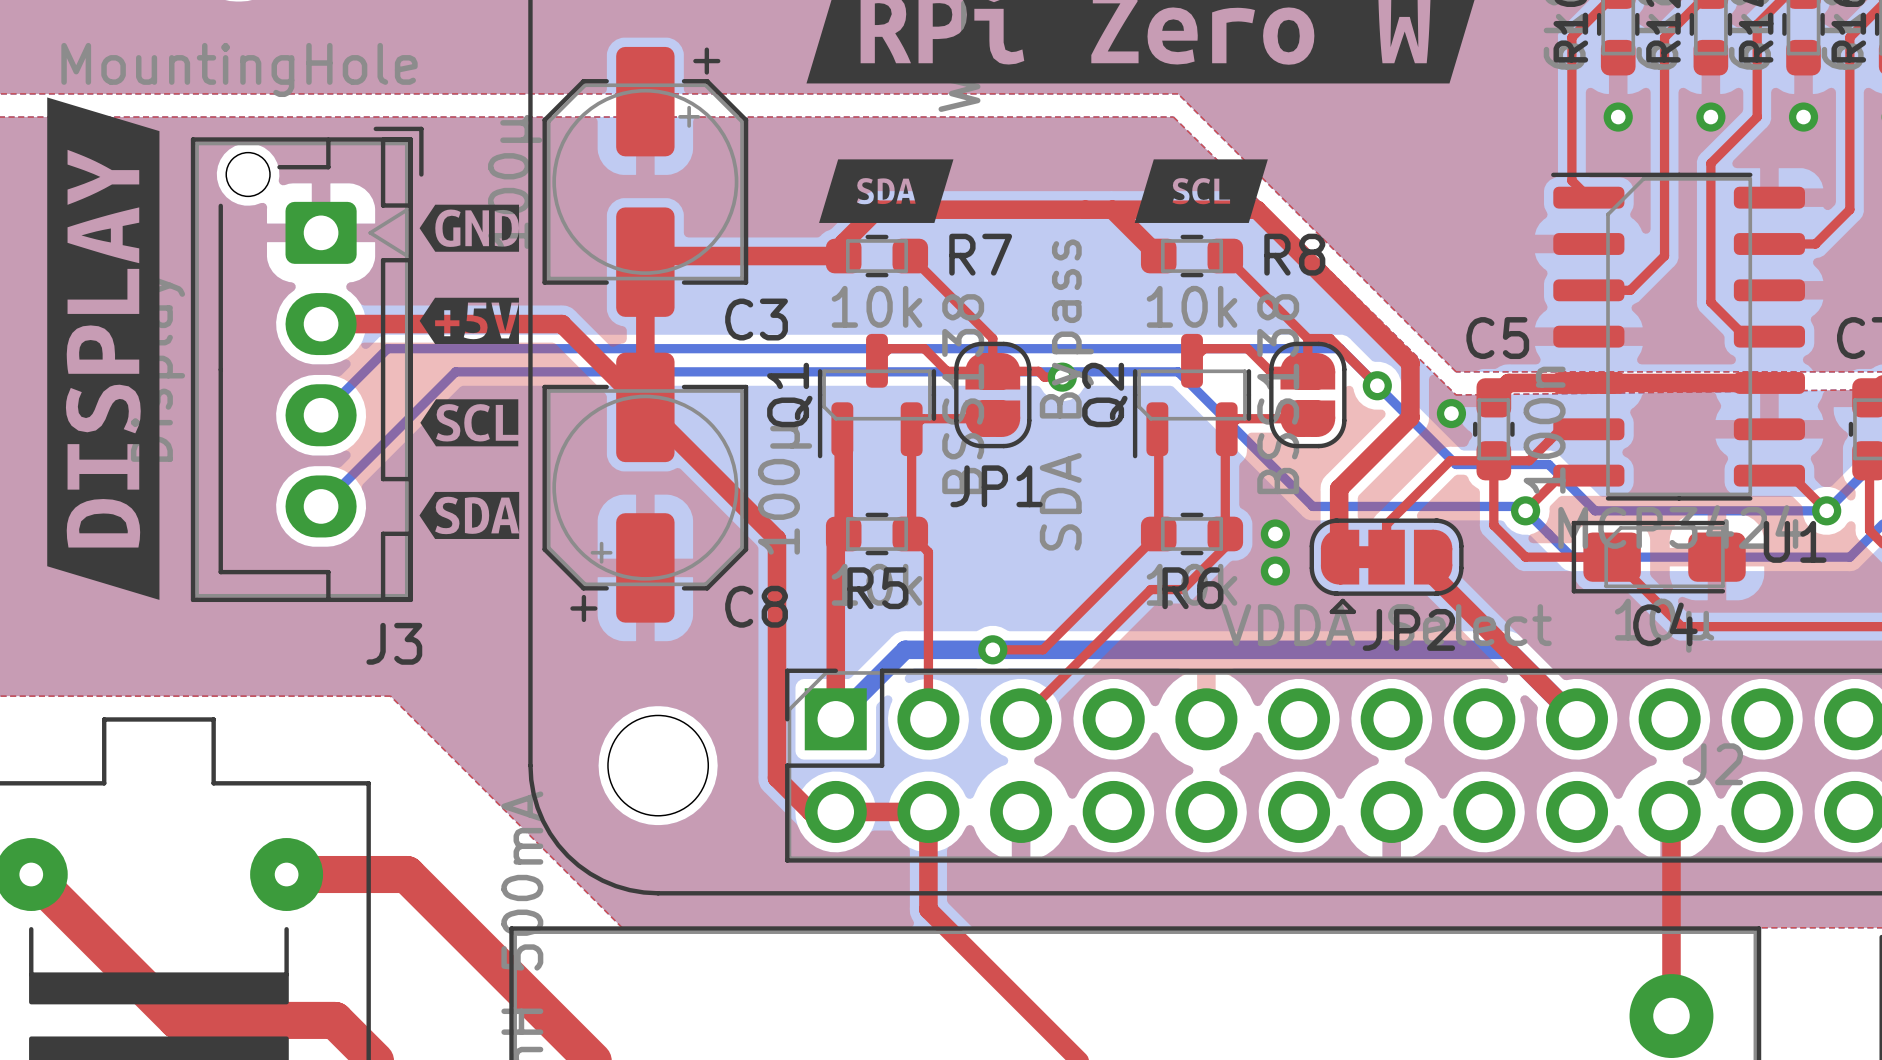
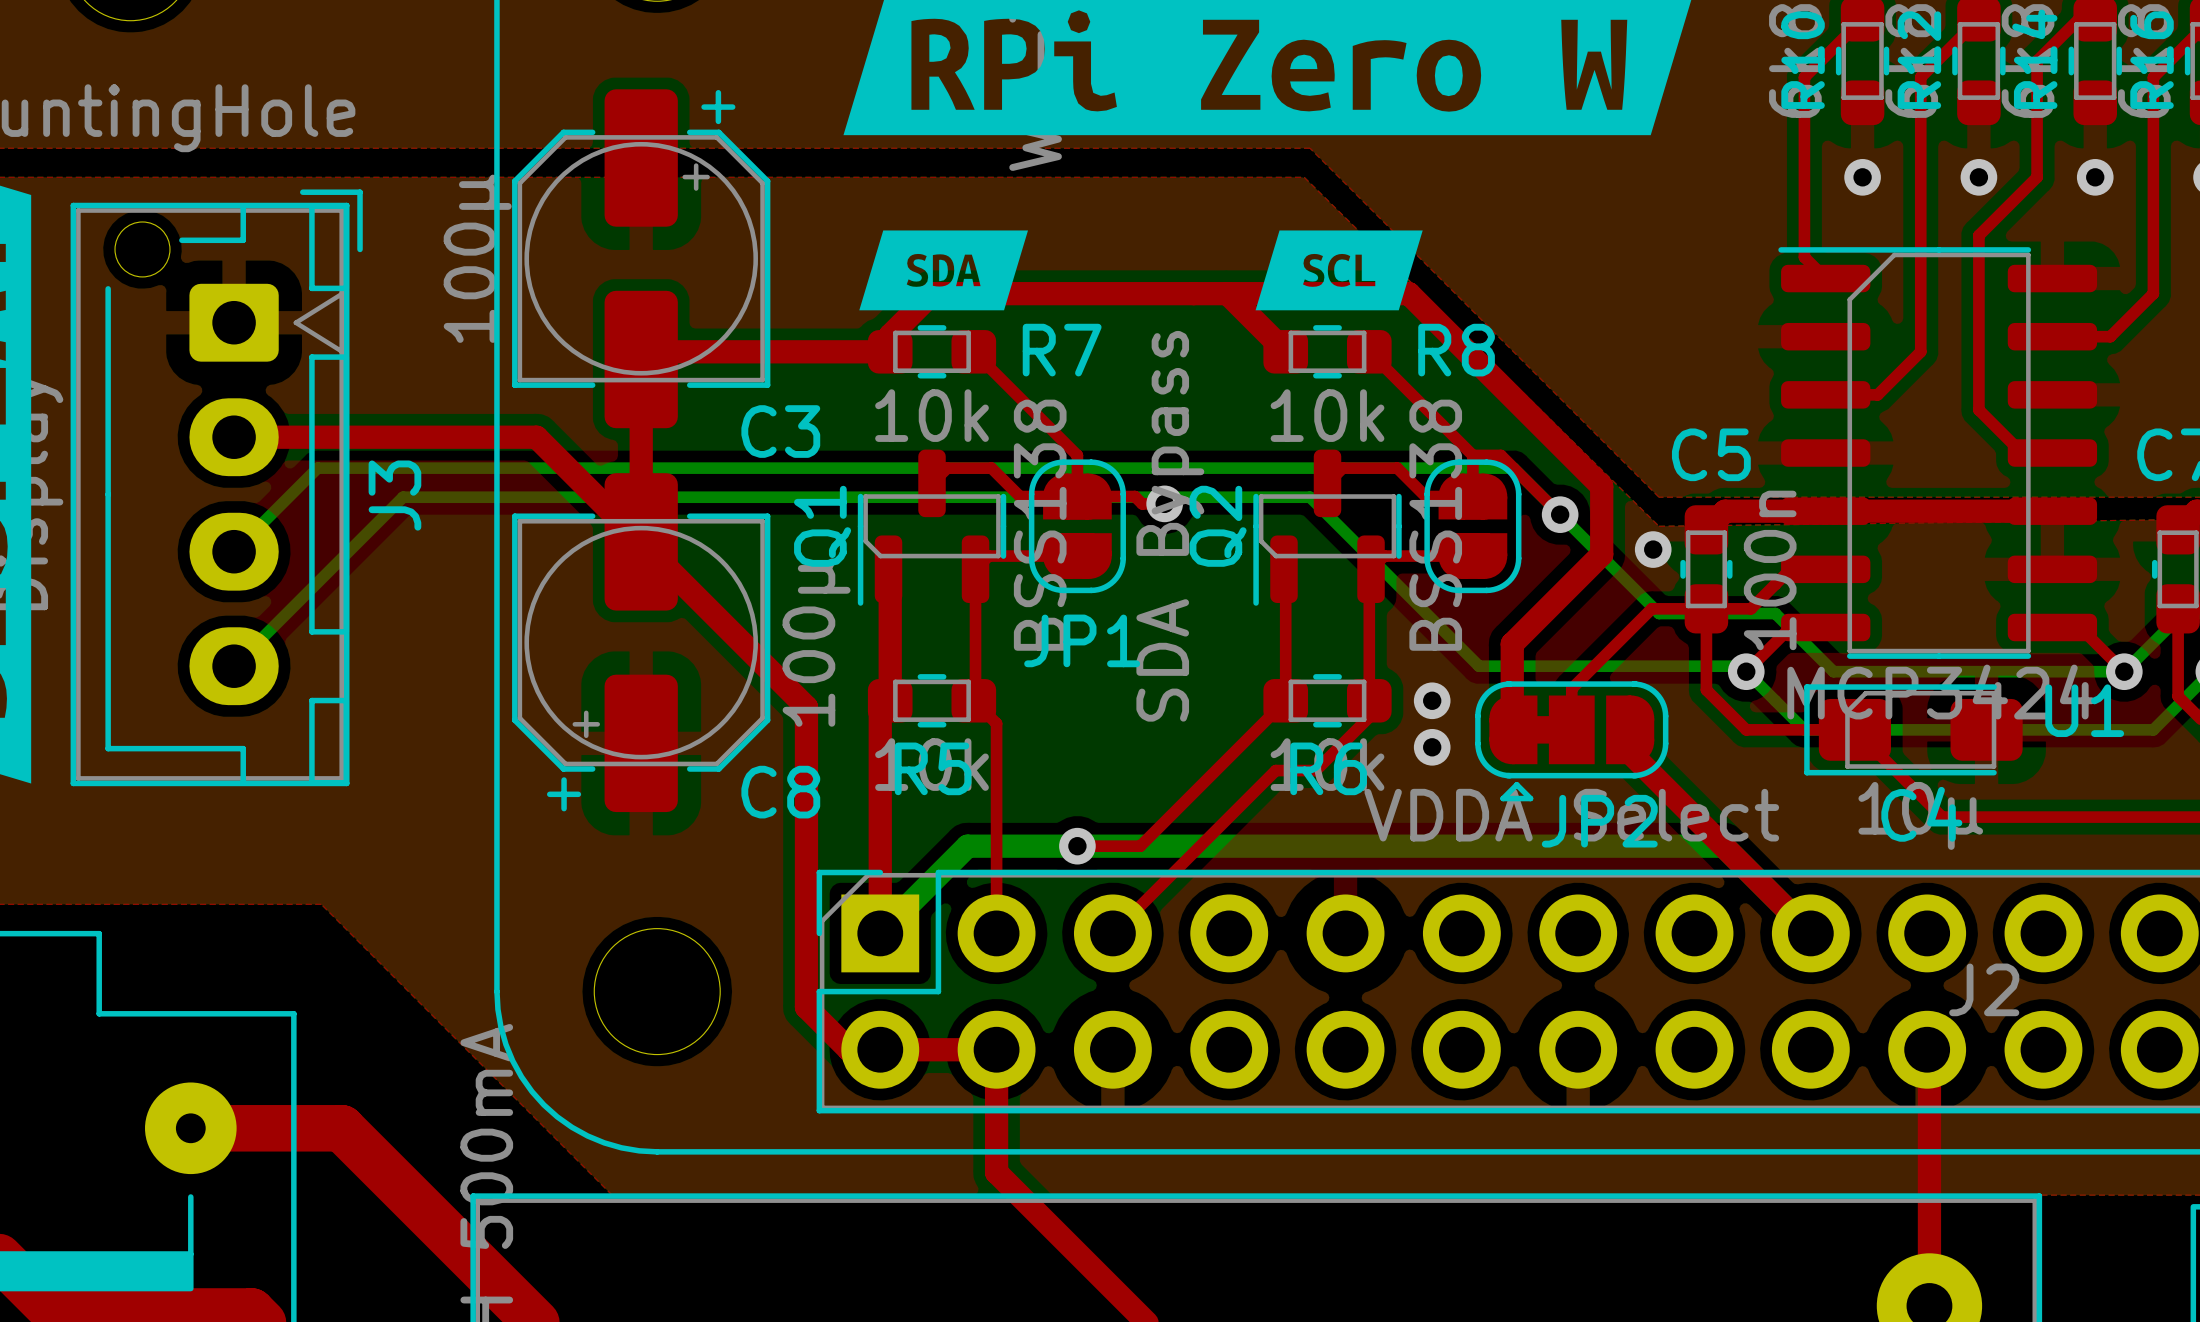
drawing: [419, 204, 520, 252] -> none
drawing: [419, 297, 519, 345] -> none
drawing: [420, 399, 519, 447] -> none
drawing: [419, 491, 520, 539] -> none
J3 name rotation: 0° (394, 643) -> 90° counterclockwise (394, 495)
J3 name position: J3 (394, 643) -> J3 (394, 495)

